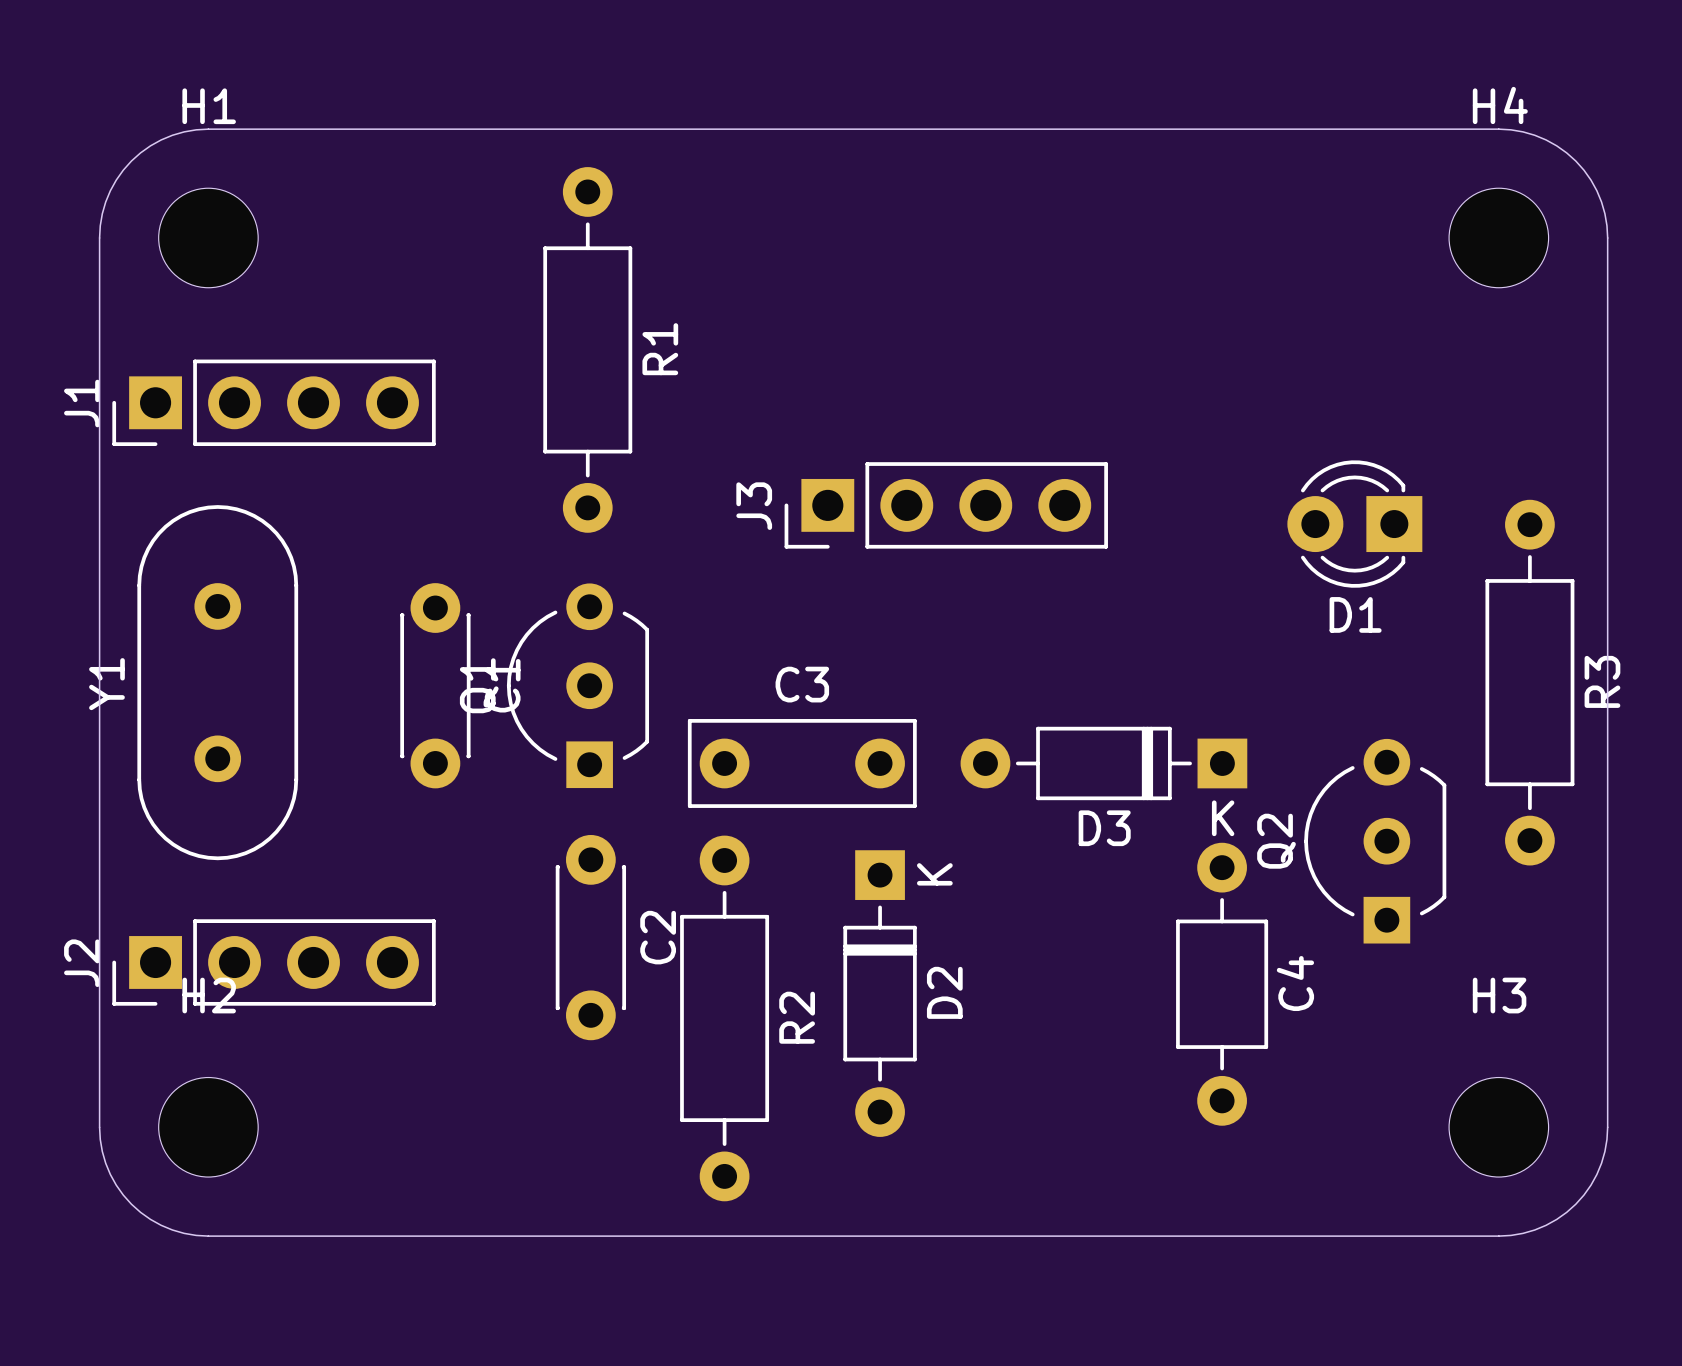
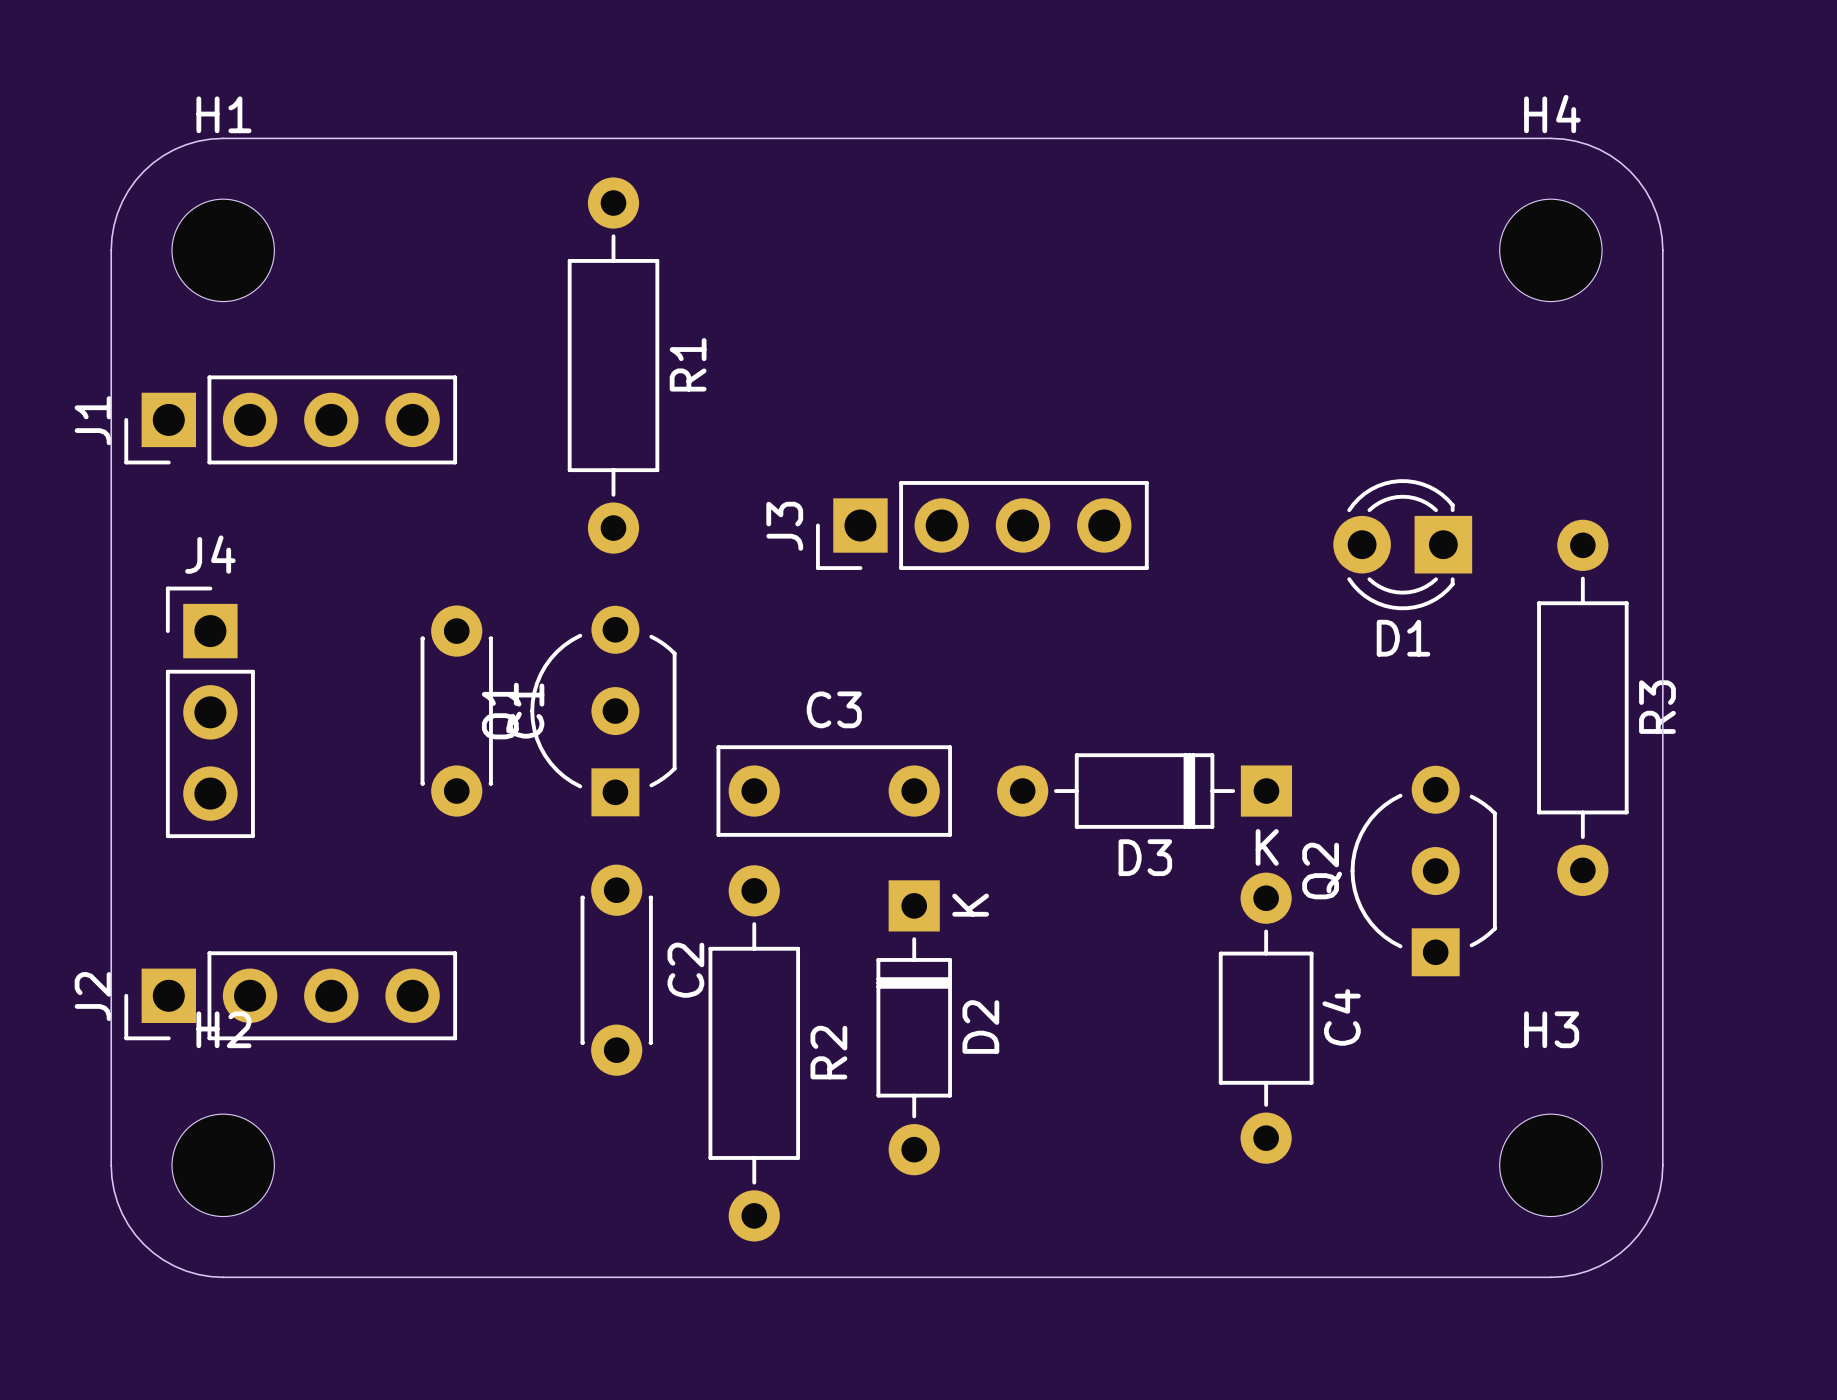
Y1: (217, 682) -> none
J4: none -> (210, 712)

